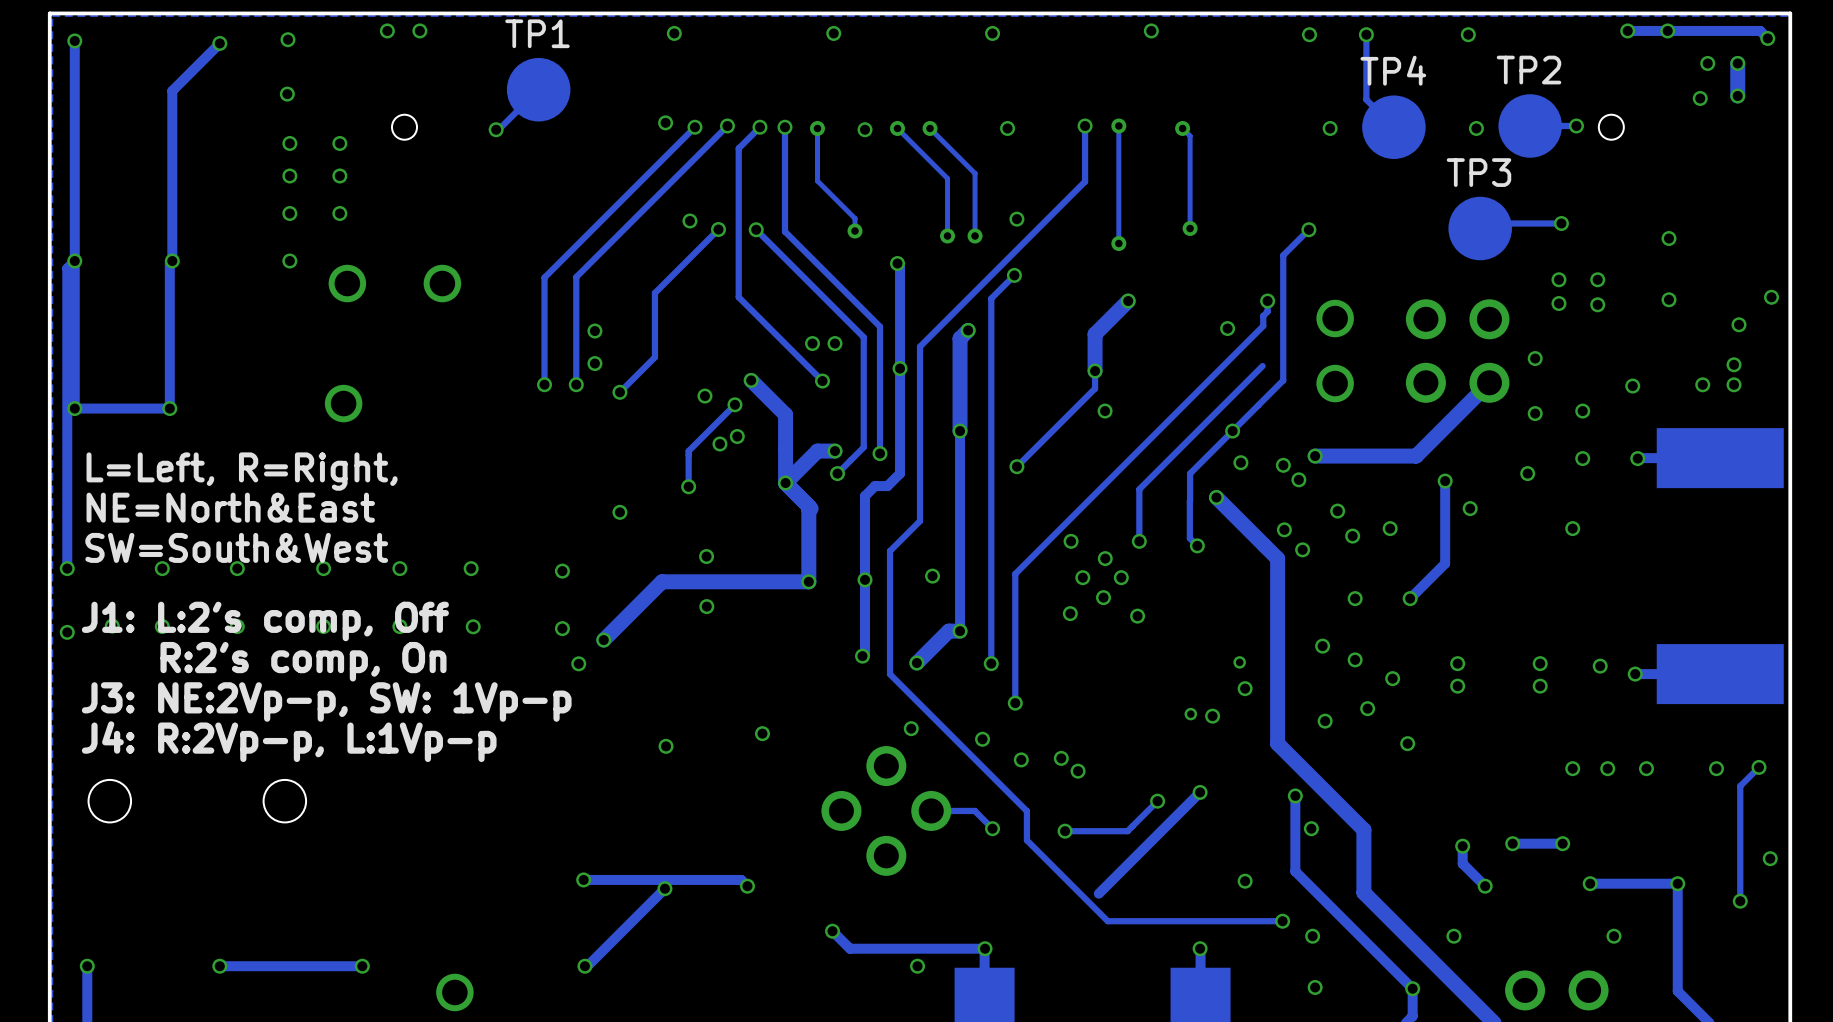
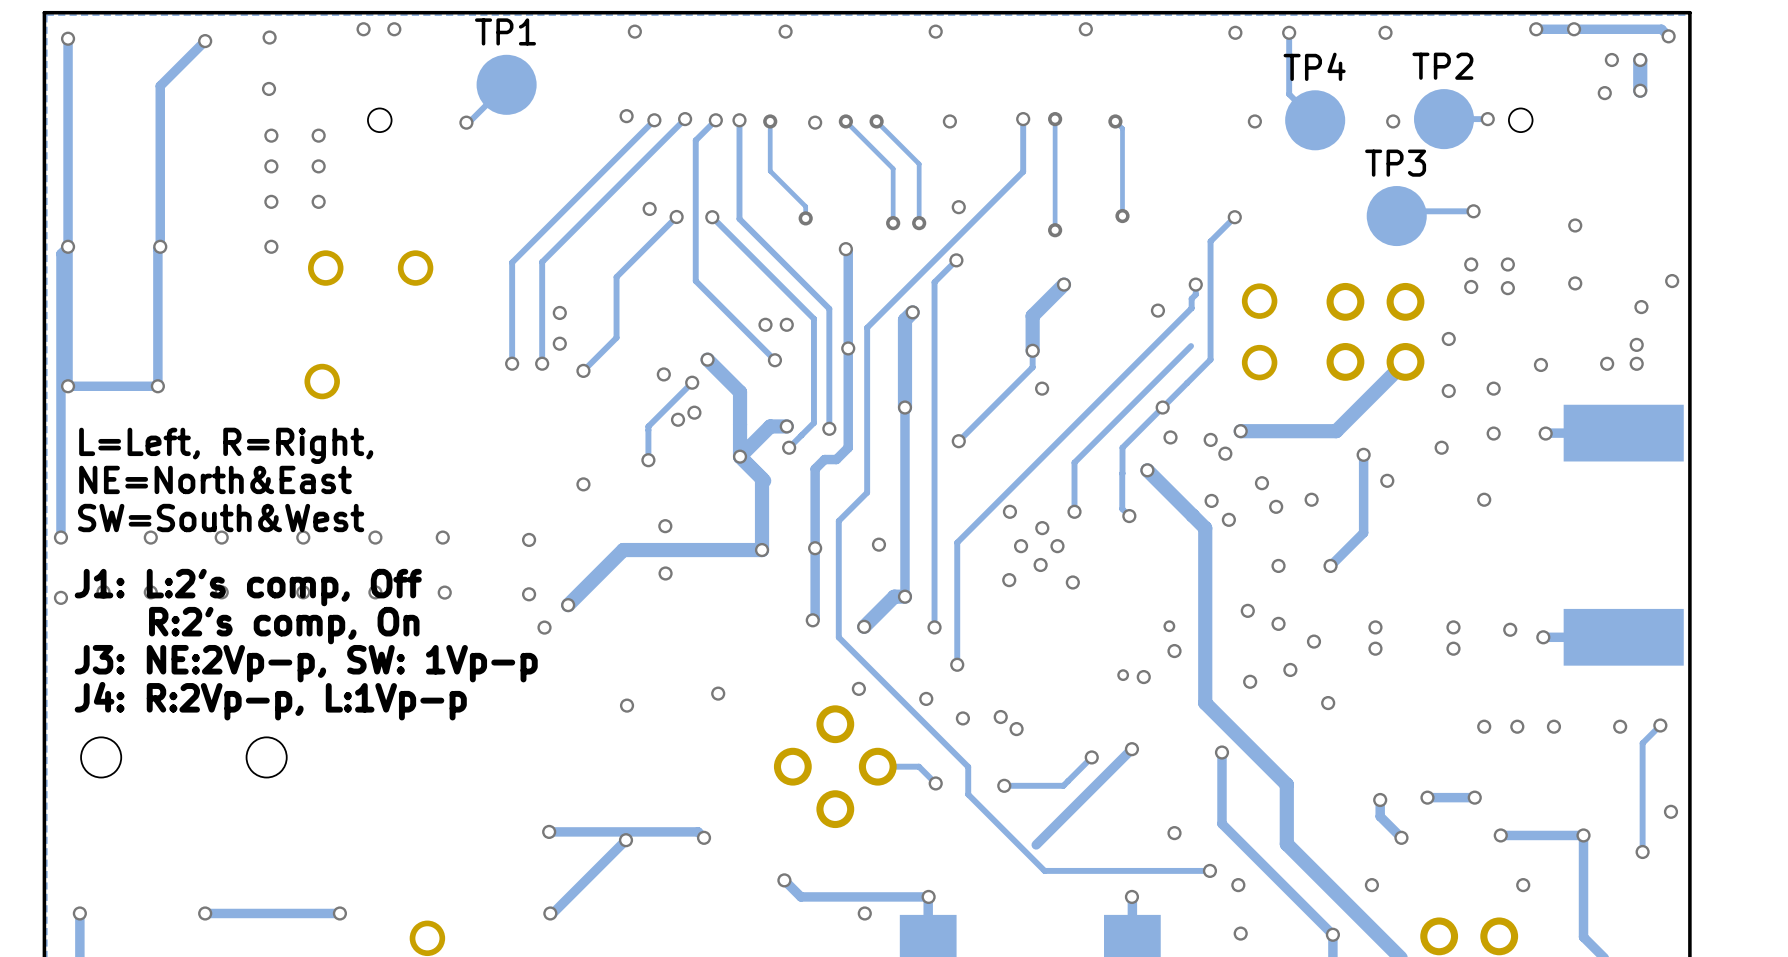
via: (1311, 828) -> none

